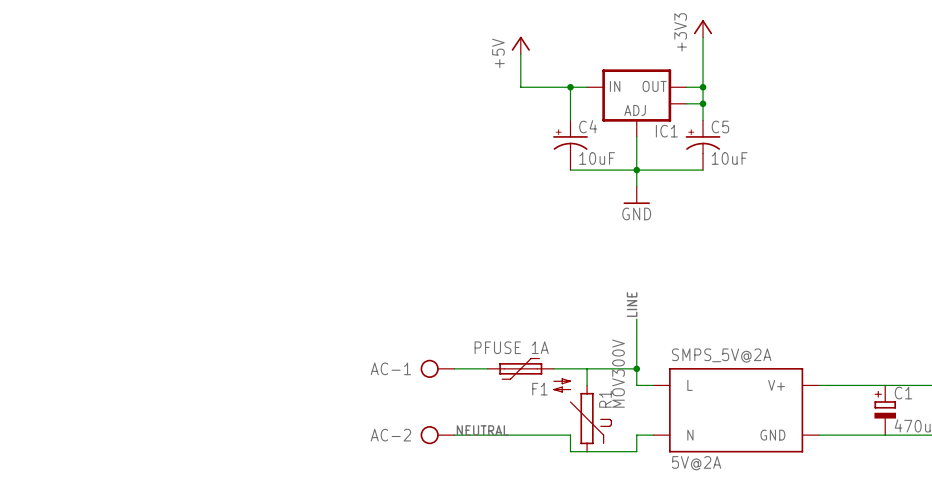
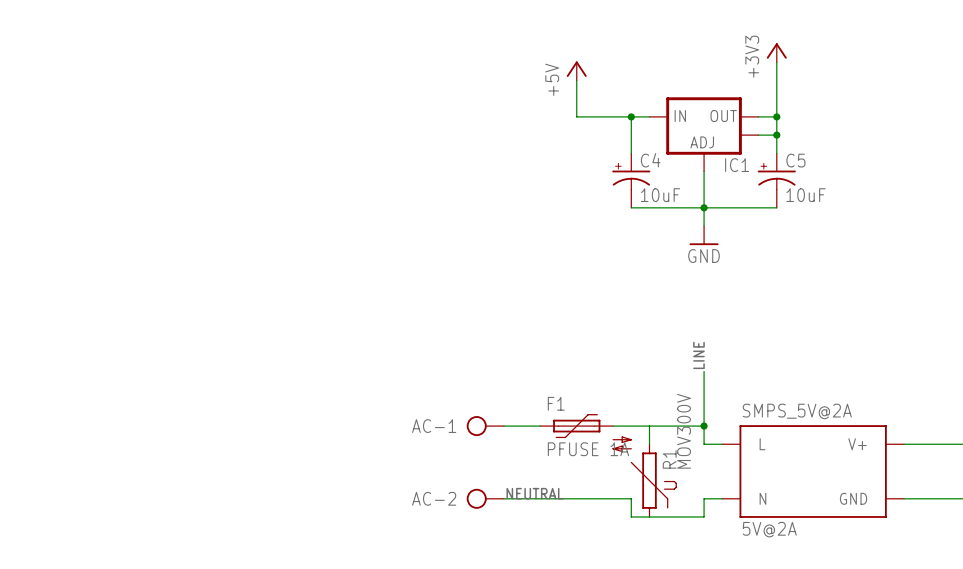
F1 value position: PFUSE 1A (511, 347) -> PFUSE 1A (588, 449)
F1 name position: F1 (539, 389) -> F1 (556, 403)

